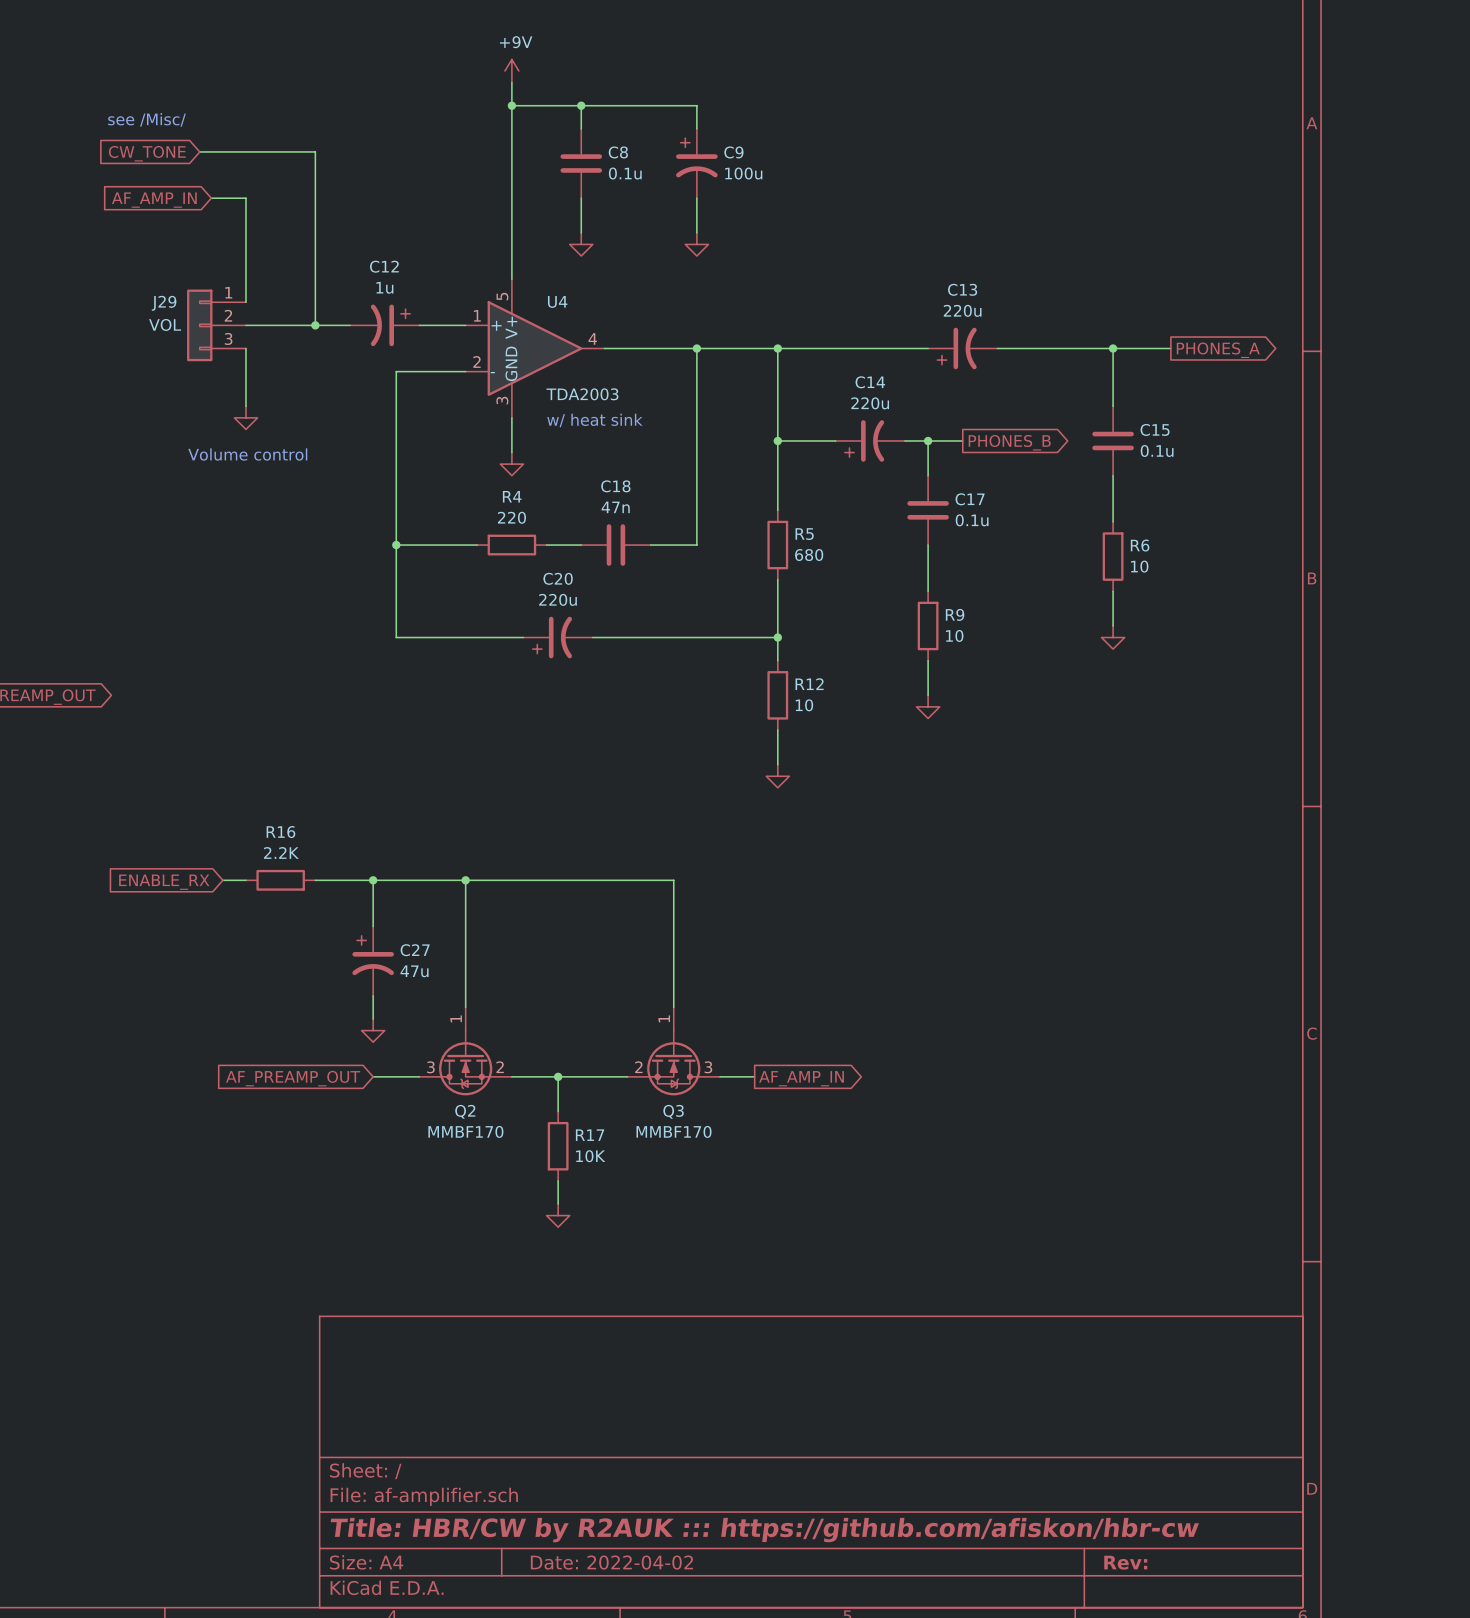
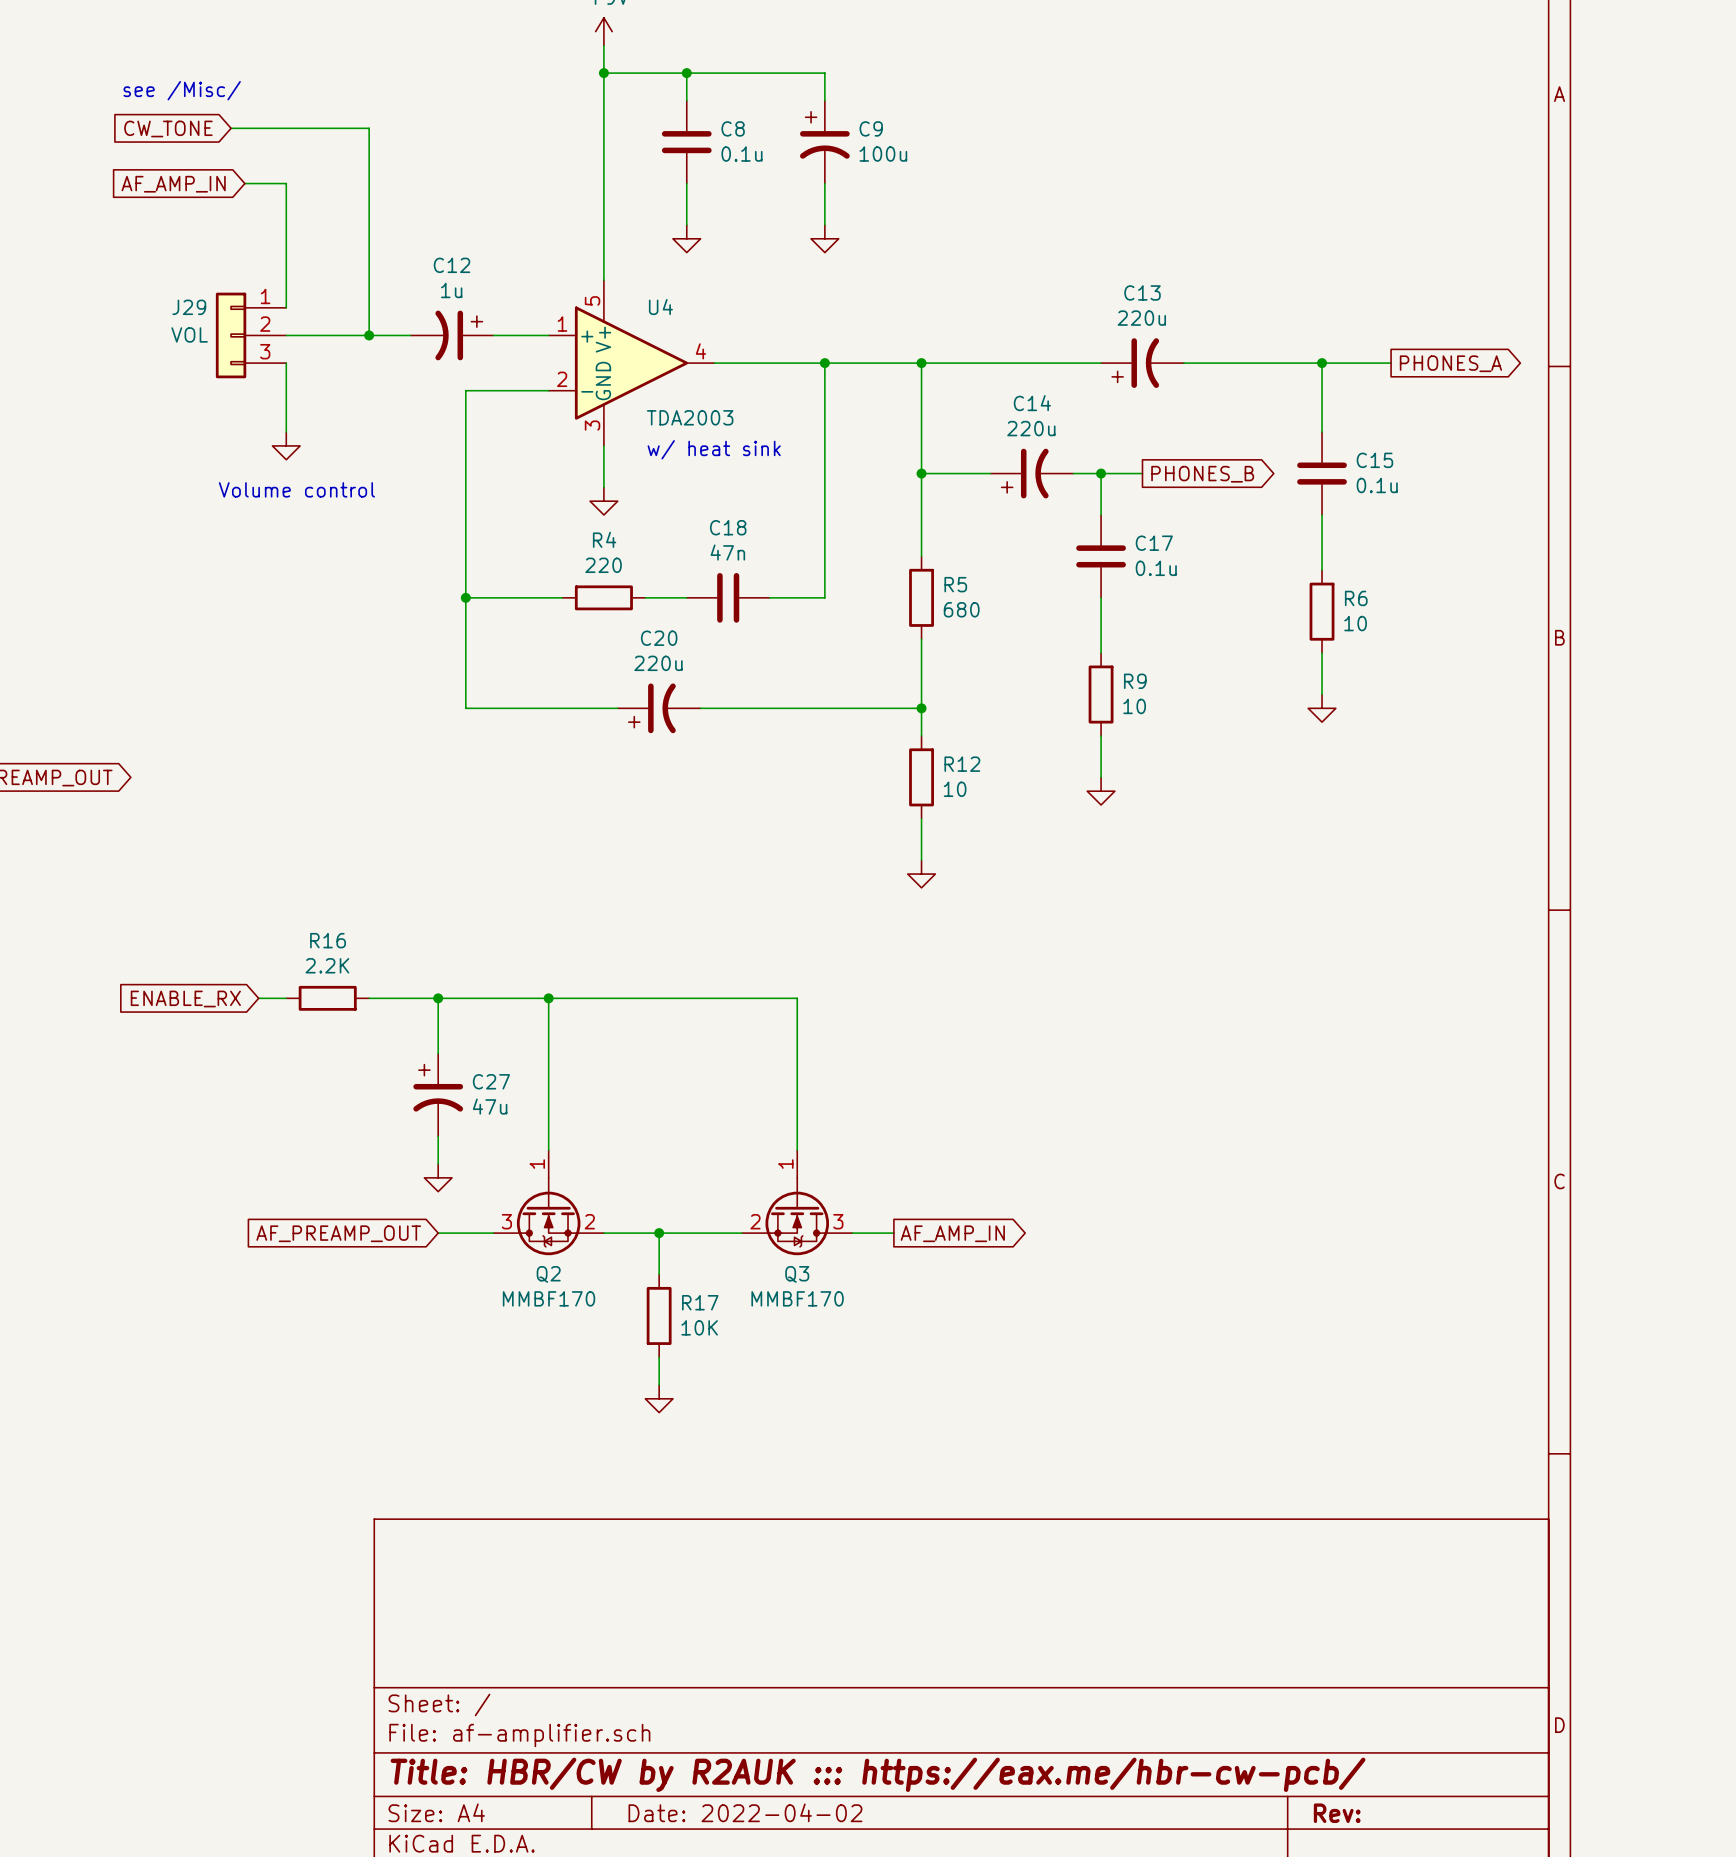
title block: Title: HBR/CW by R2AUK ::: https://github.com/afiskon/hbr-cw (764, 1530) -> Title: HBR/CW by R2AUK ::: https://eax.me/hbr-cw-pcb/ (878, 1774)

